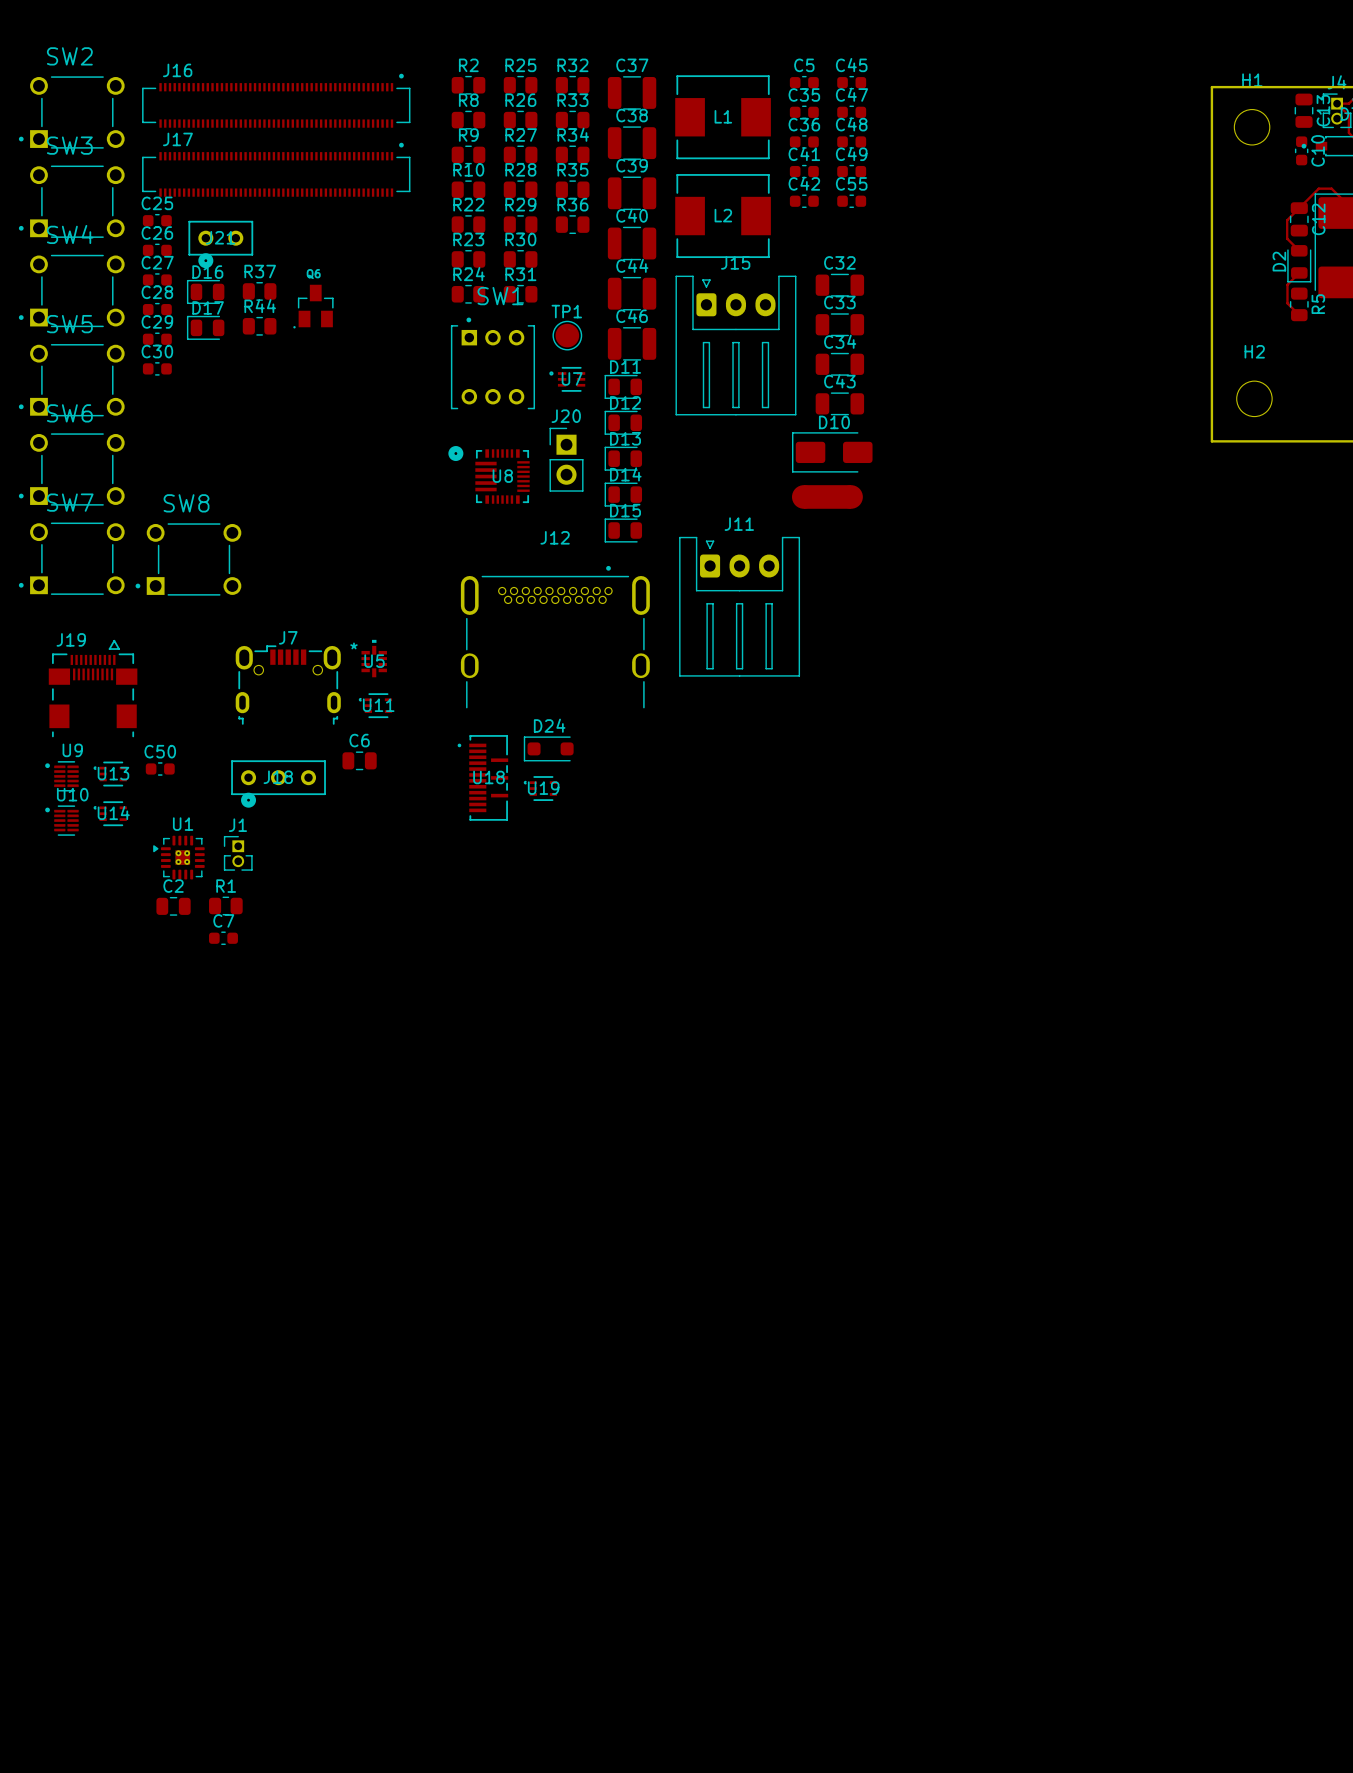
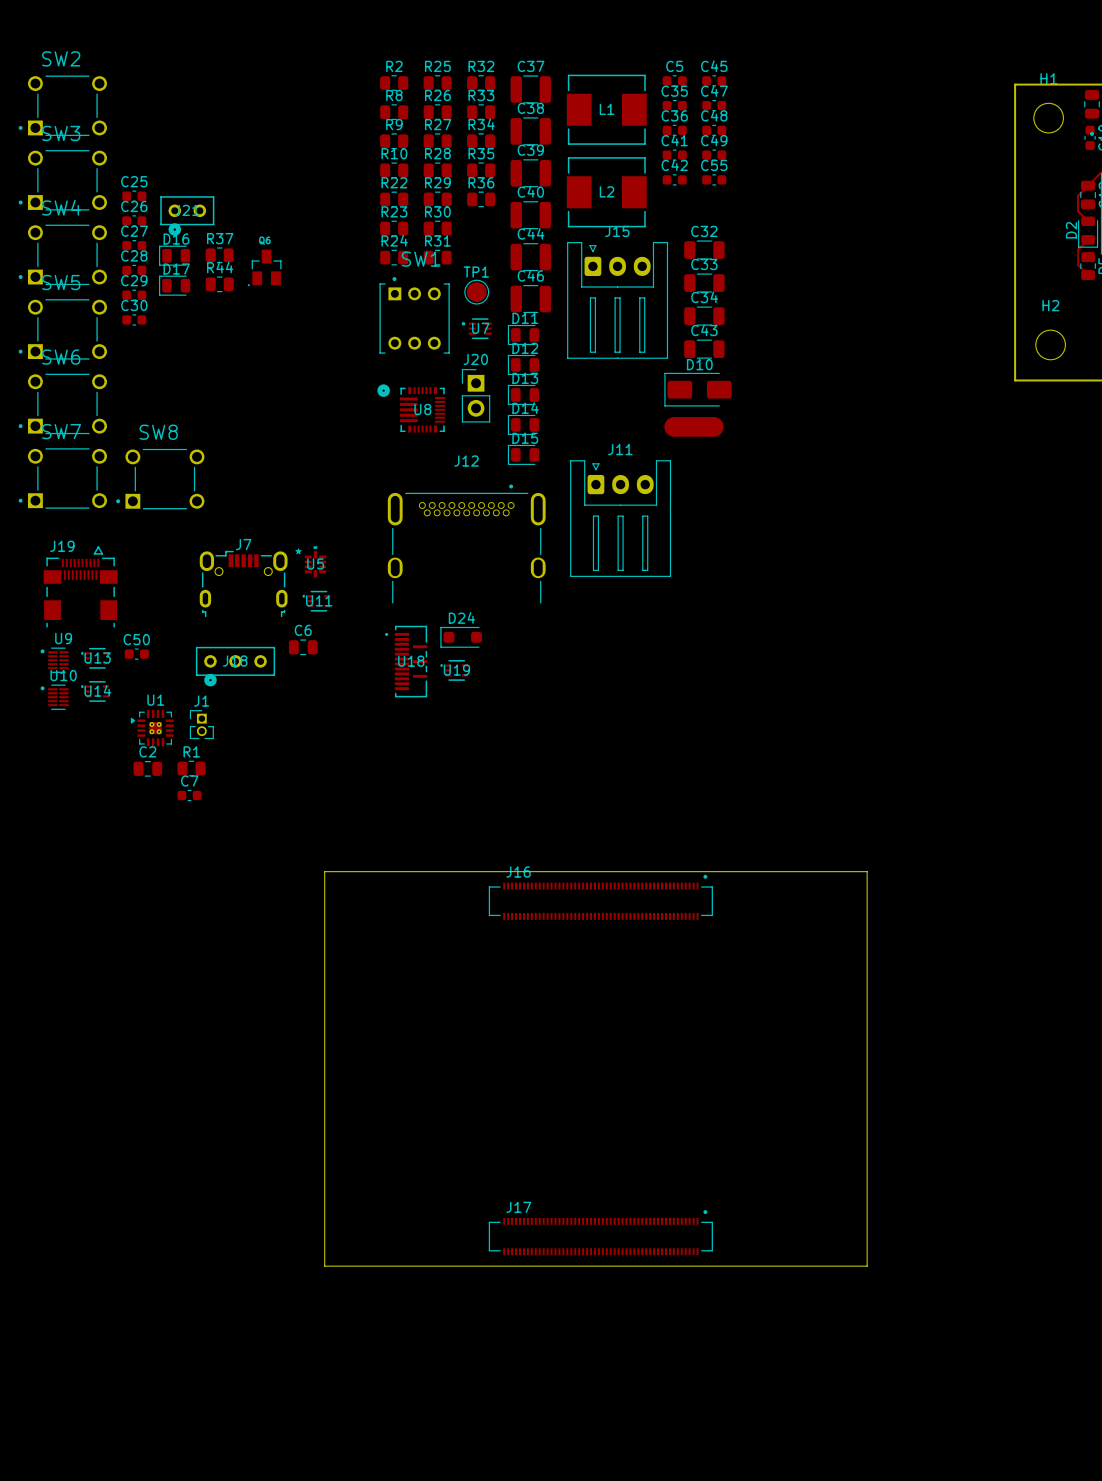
J16 position: (276, 100) -> (600, 897)
J17 position: (276, 169) -> (600, 1232)
board edge: none -> (324, 871) (867, 871) (867, 1266) (324, 1266) (324, 871)

